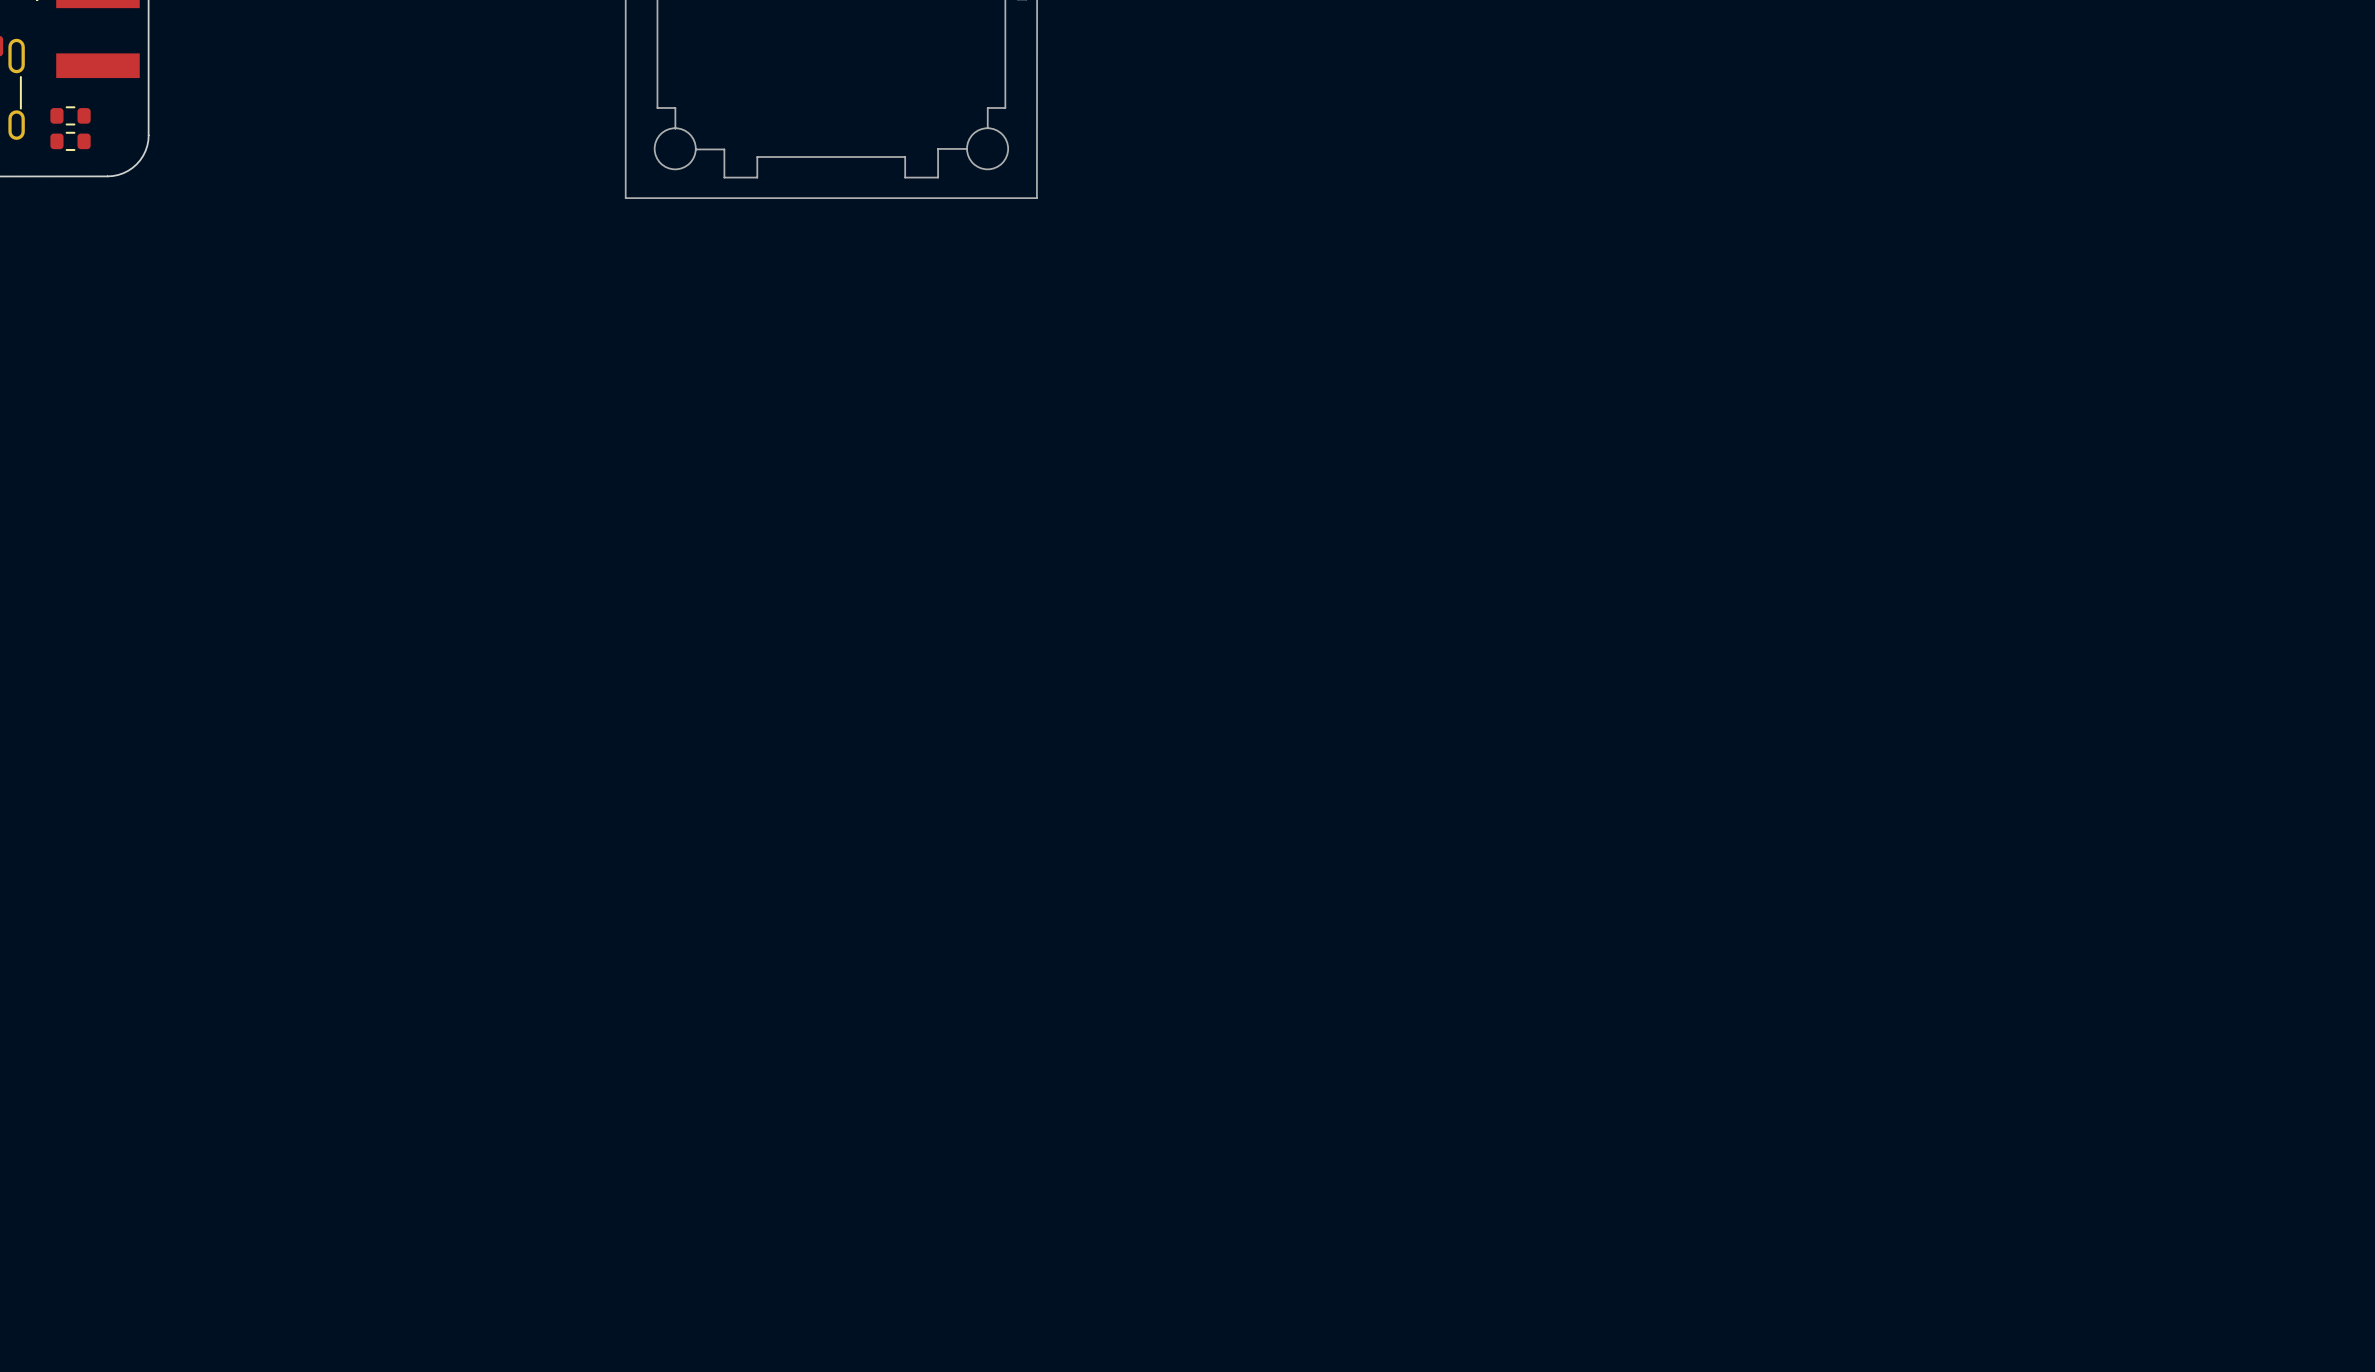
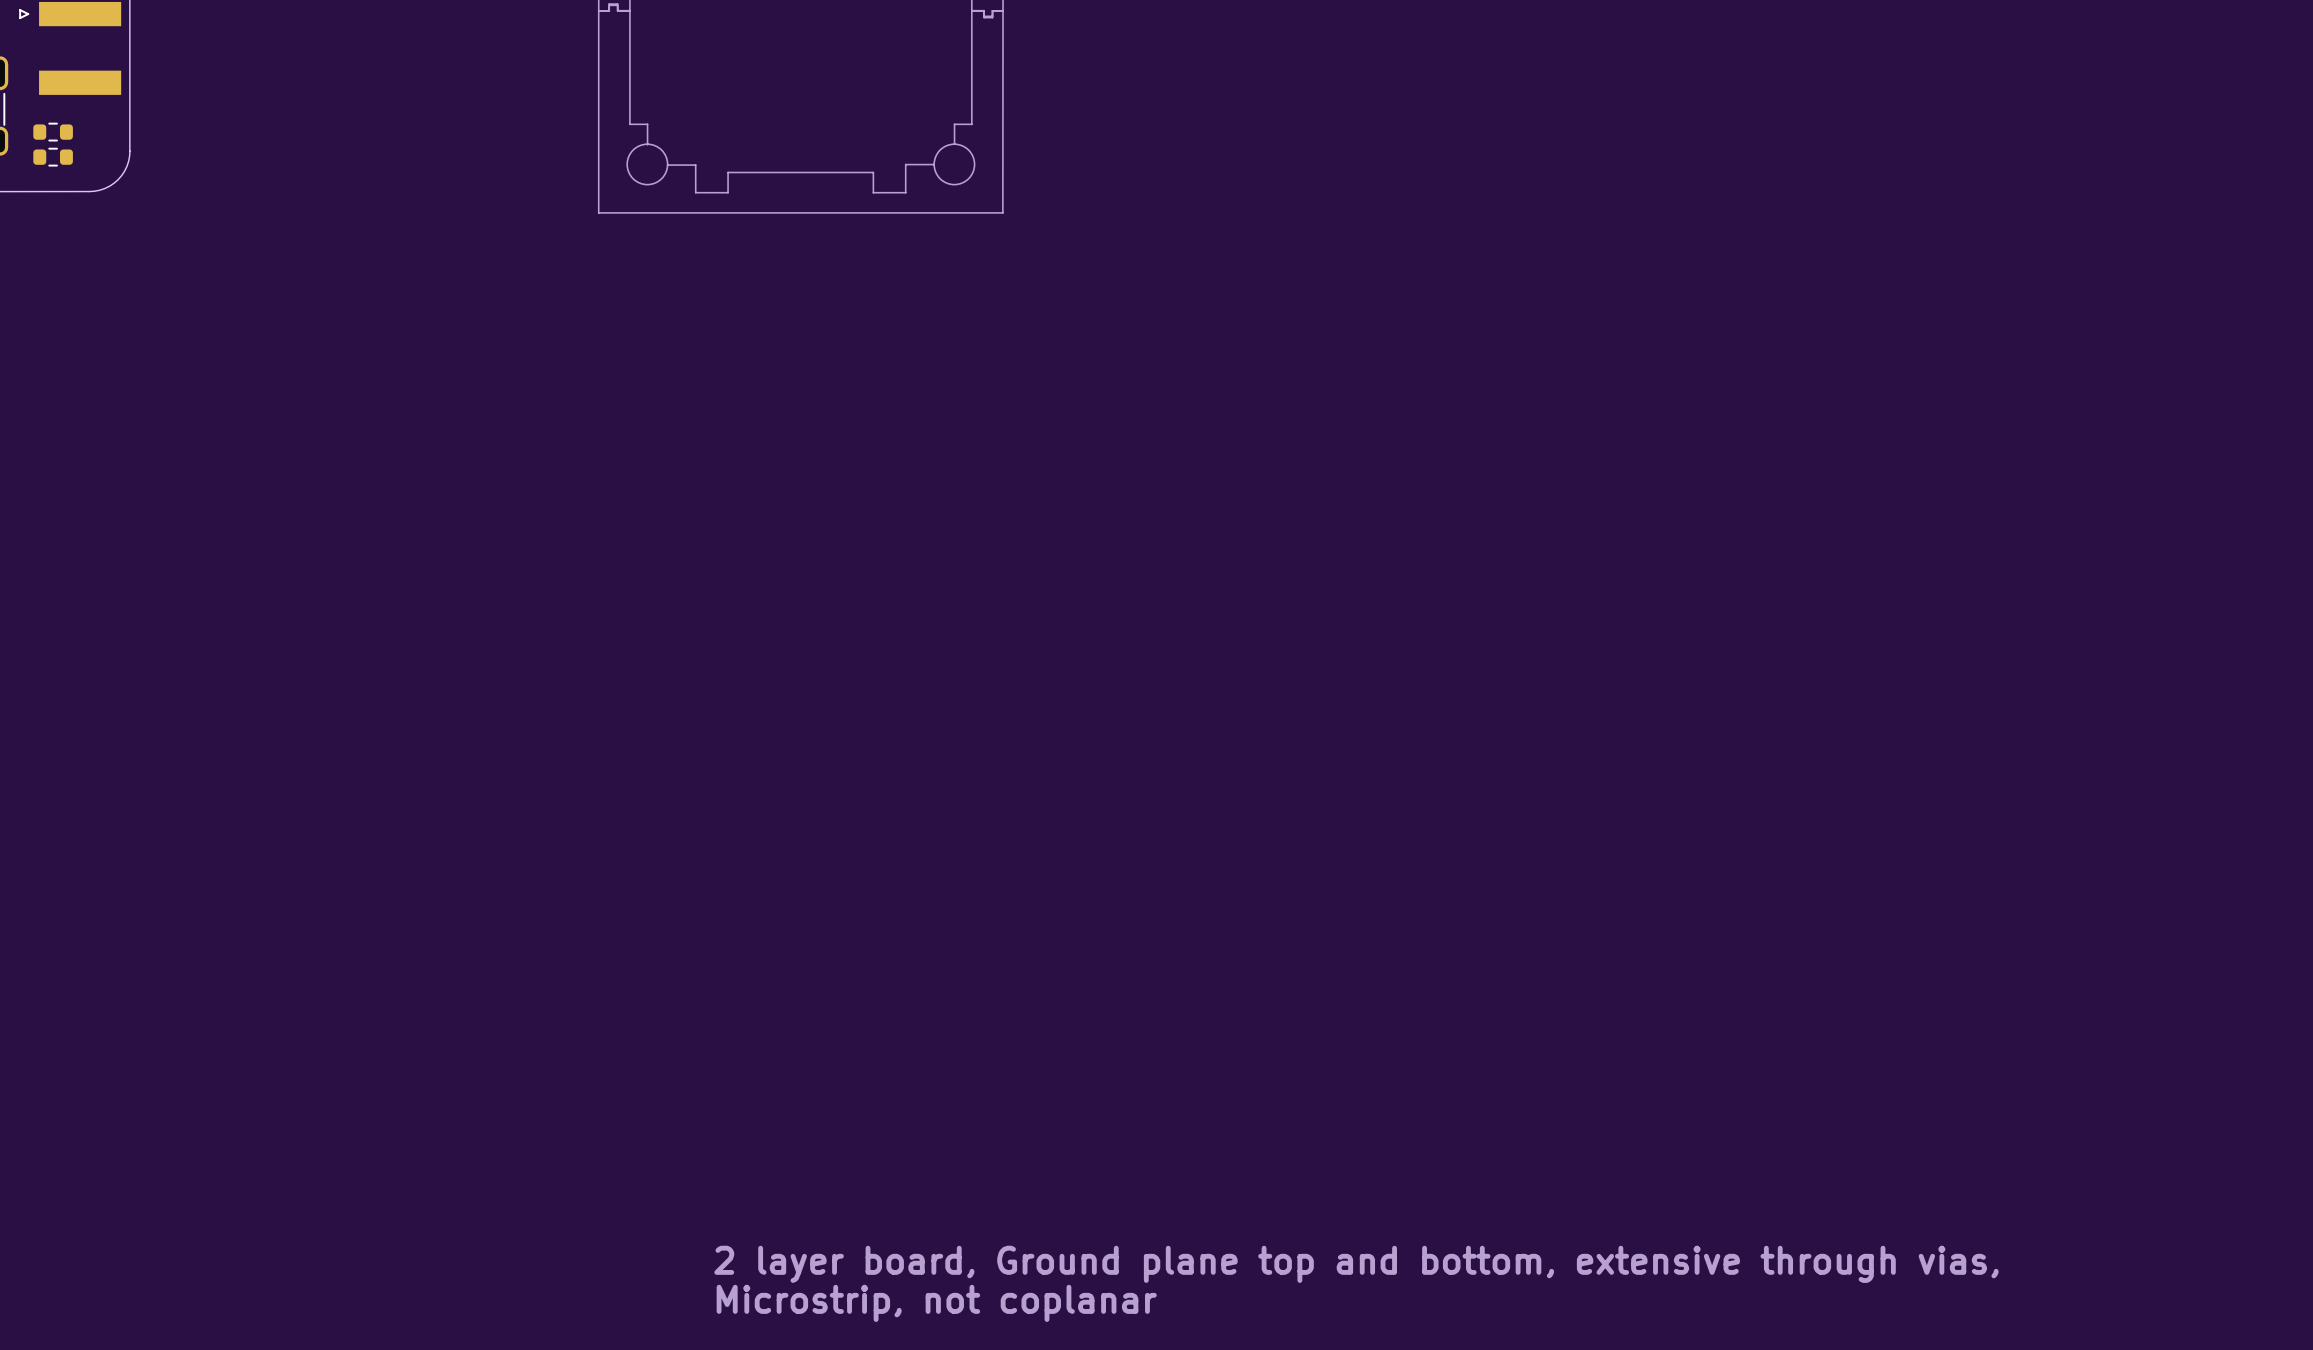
text: none -> 2 layer board, Ground plane top and bottom, extensive through vias, (1356, 1264)
text: none -> Microstrip, not coplanar (936, 1303)

